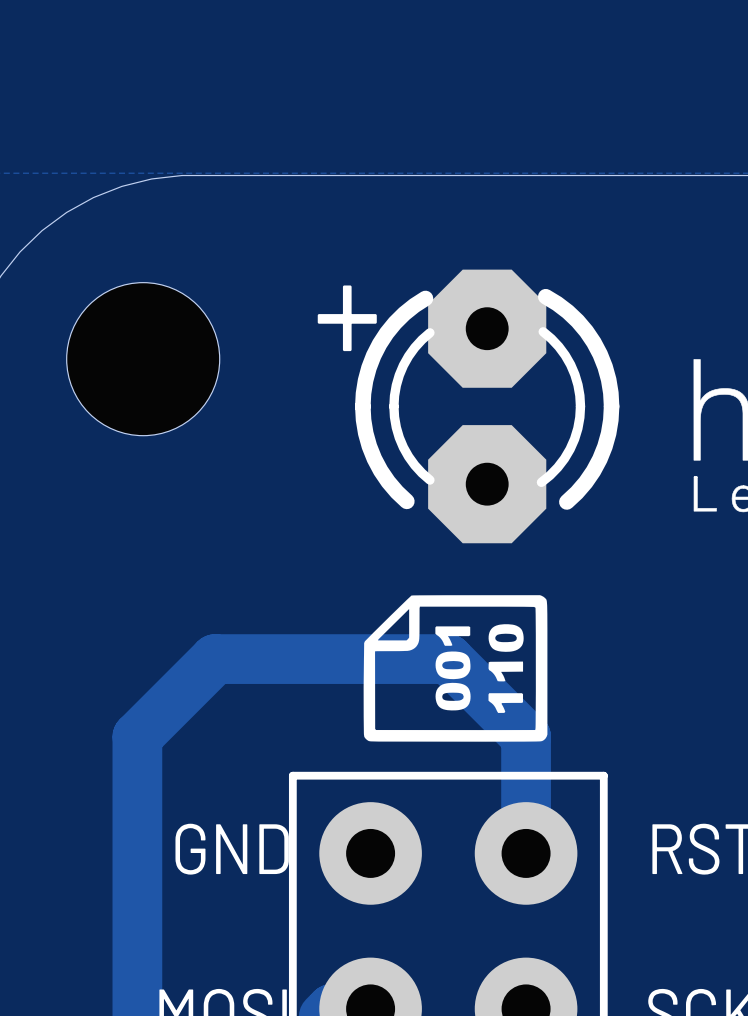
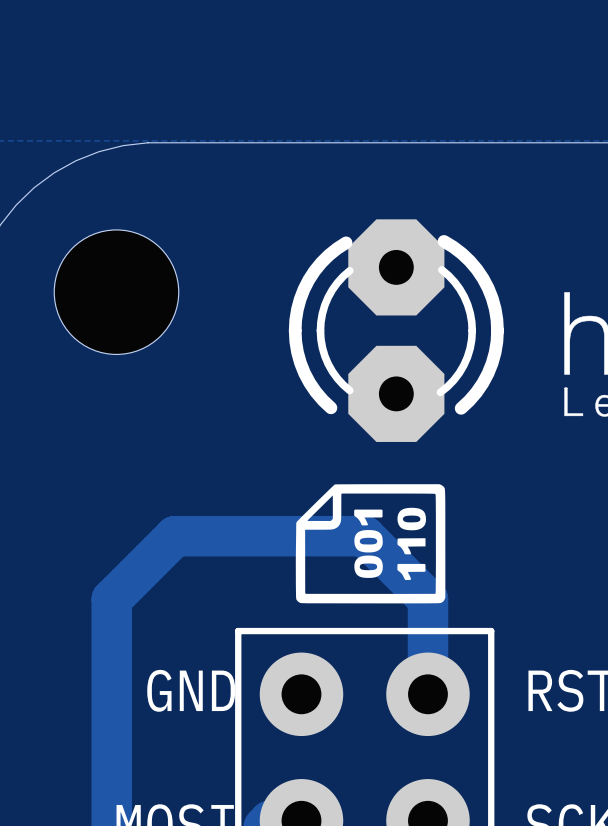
text: + (347, 318) -> none

